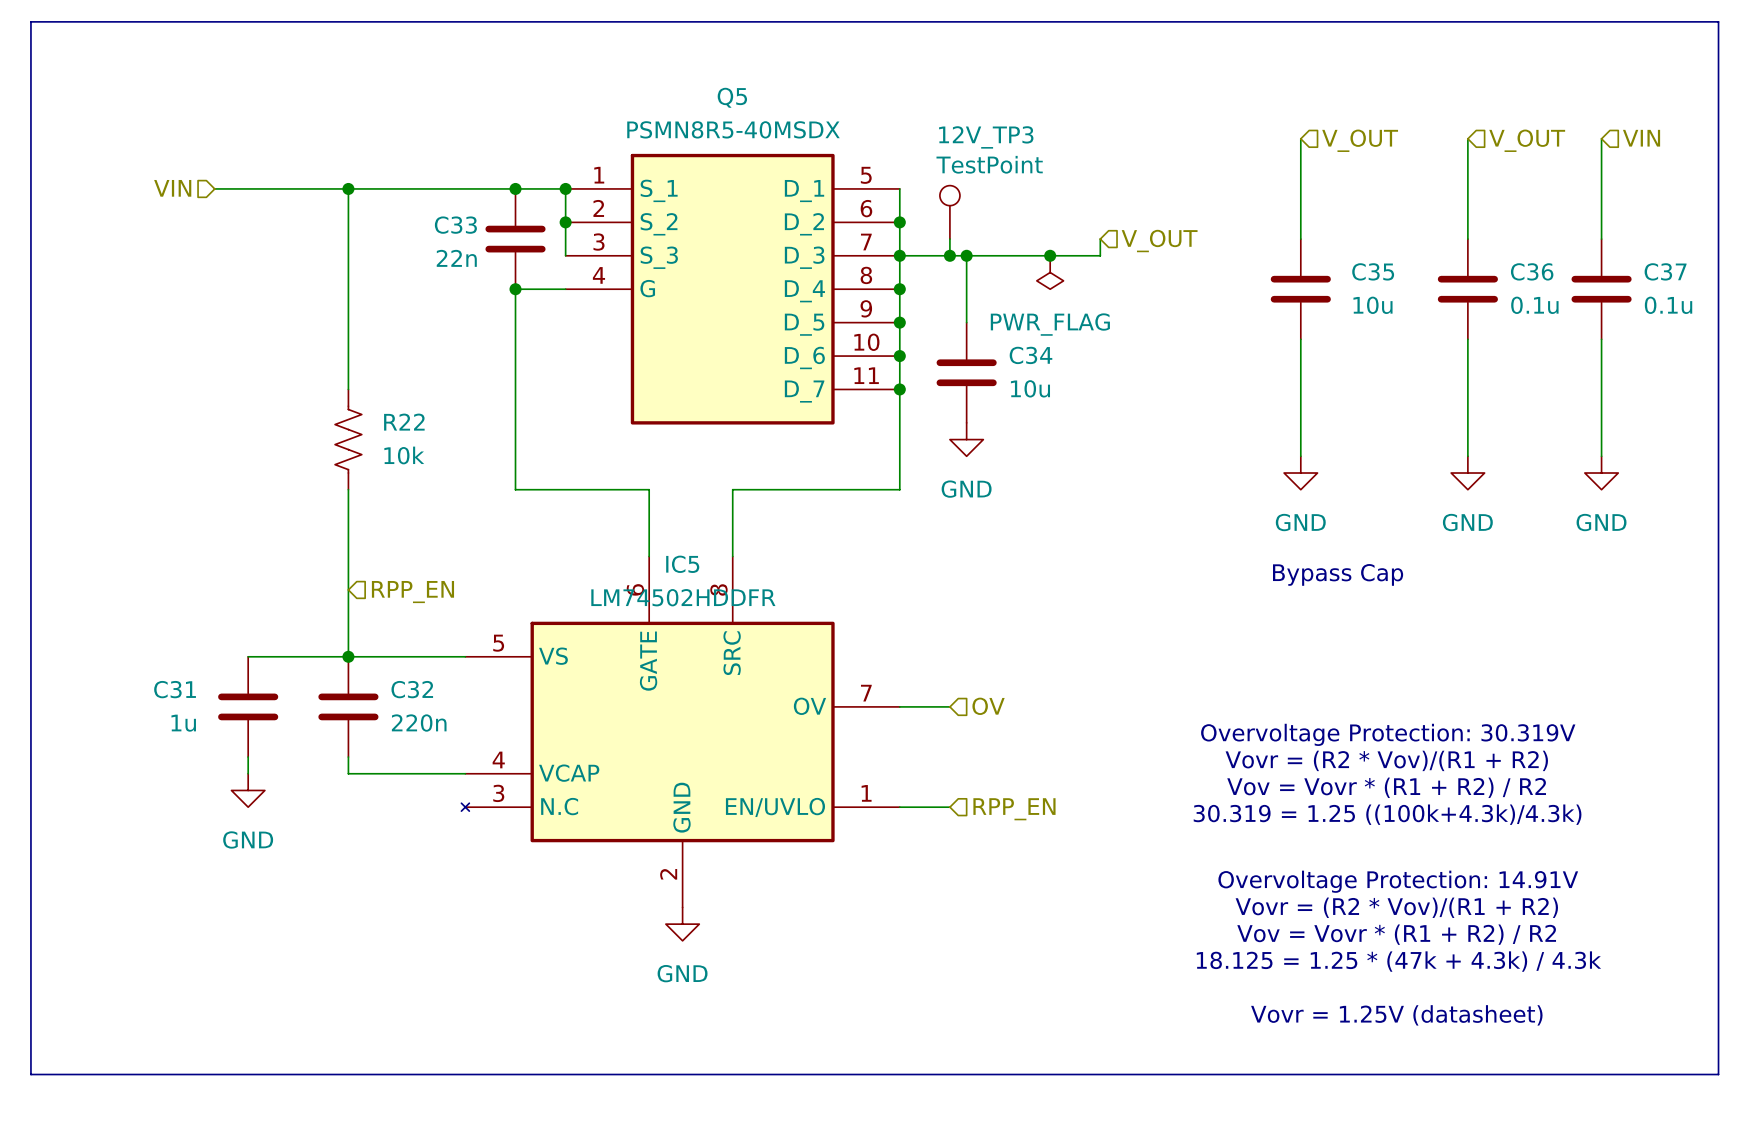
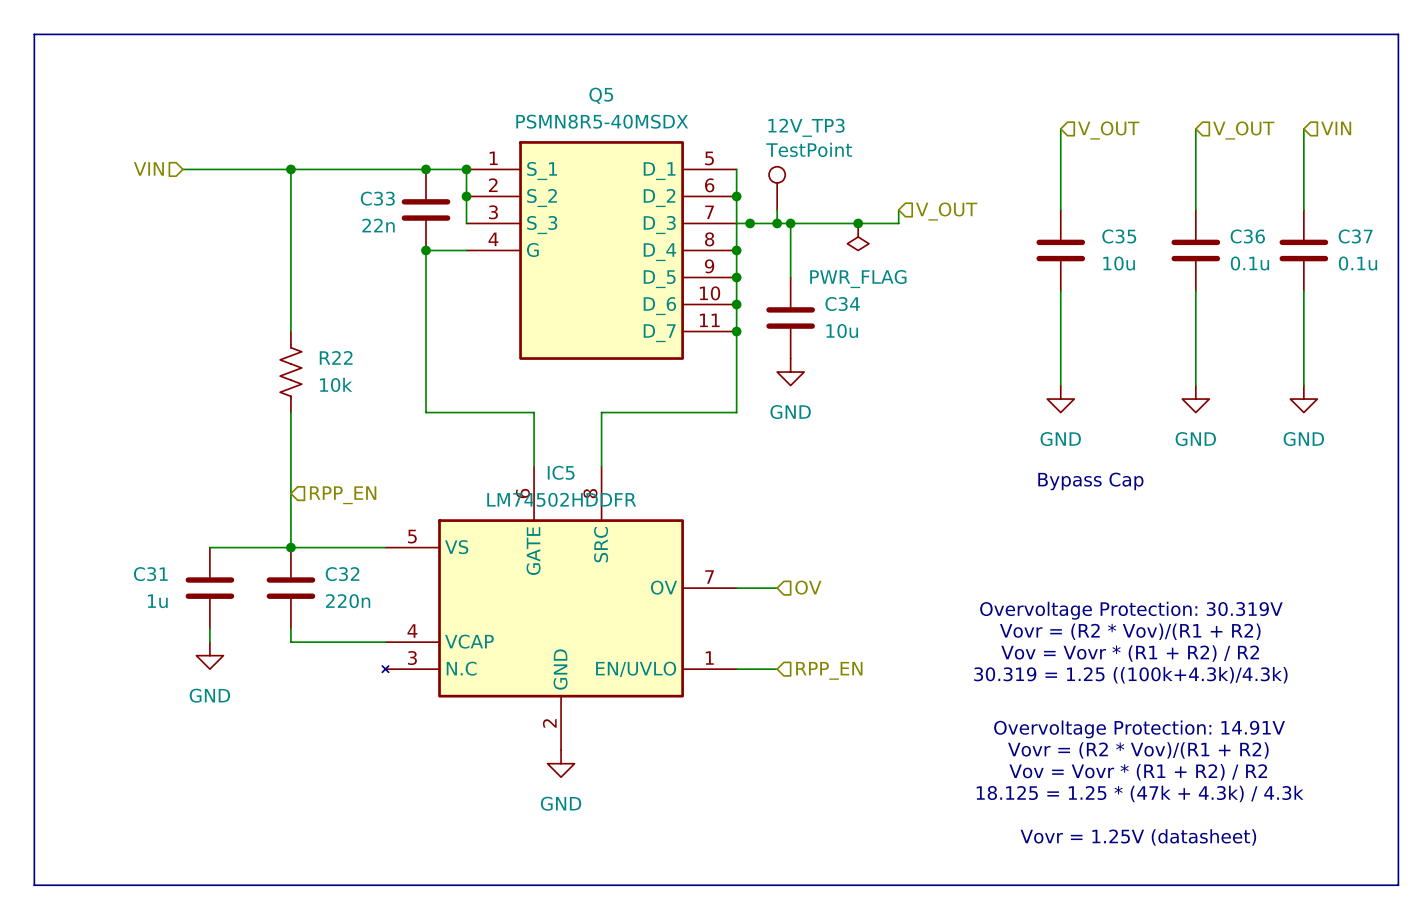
junction position: (899, 255) -> (750, 223)

